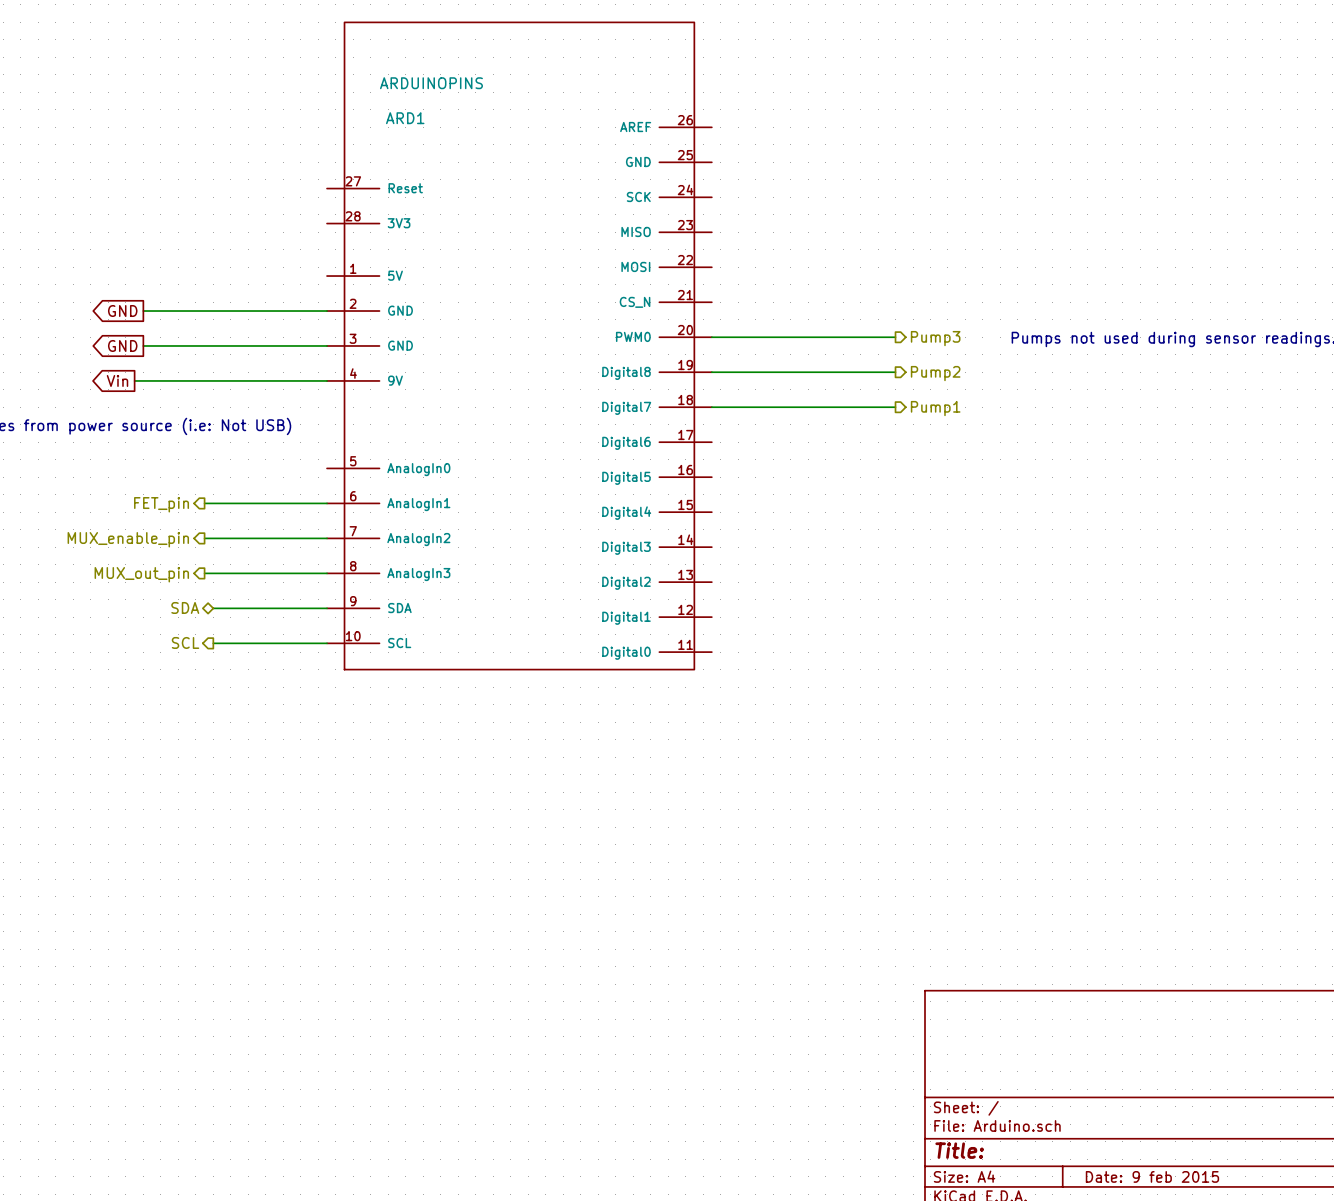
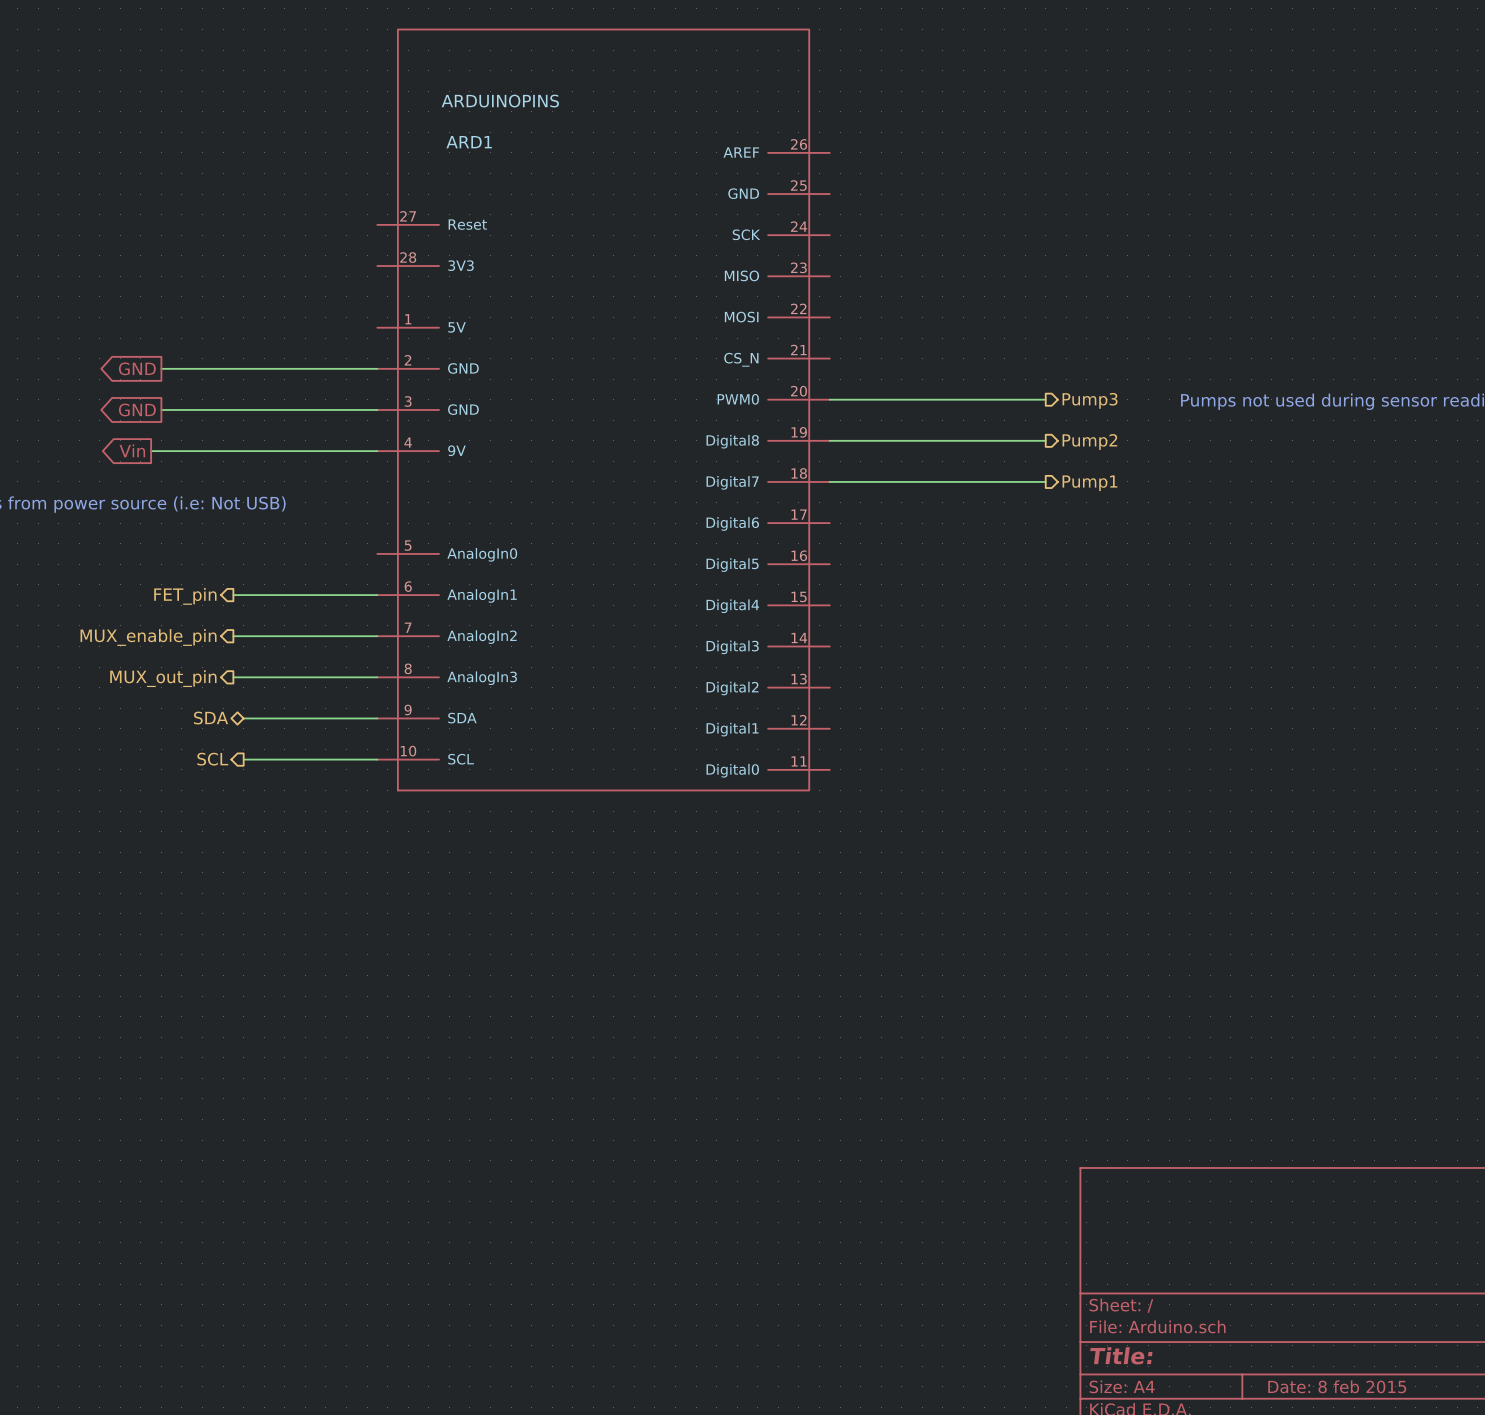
title block: Date: 9 feb 2015 (1152, 1176) -> Date: 8 feb 2015 (1337, 1386)

